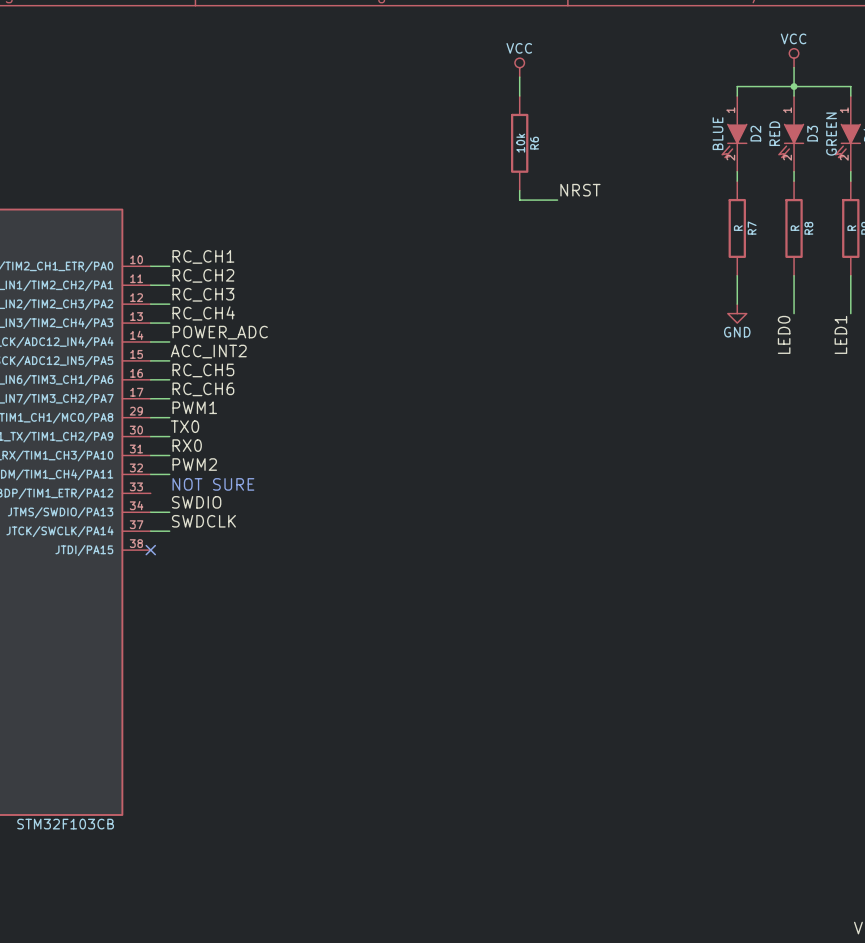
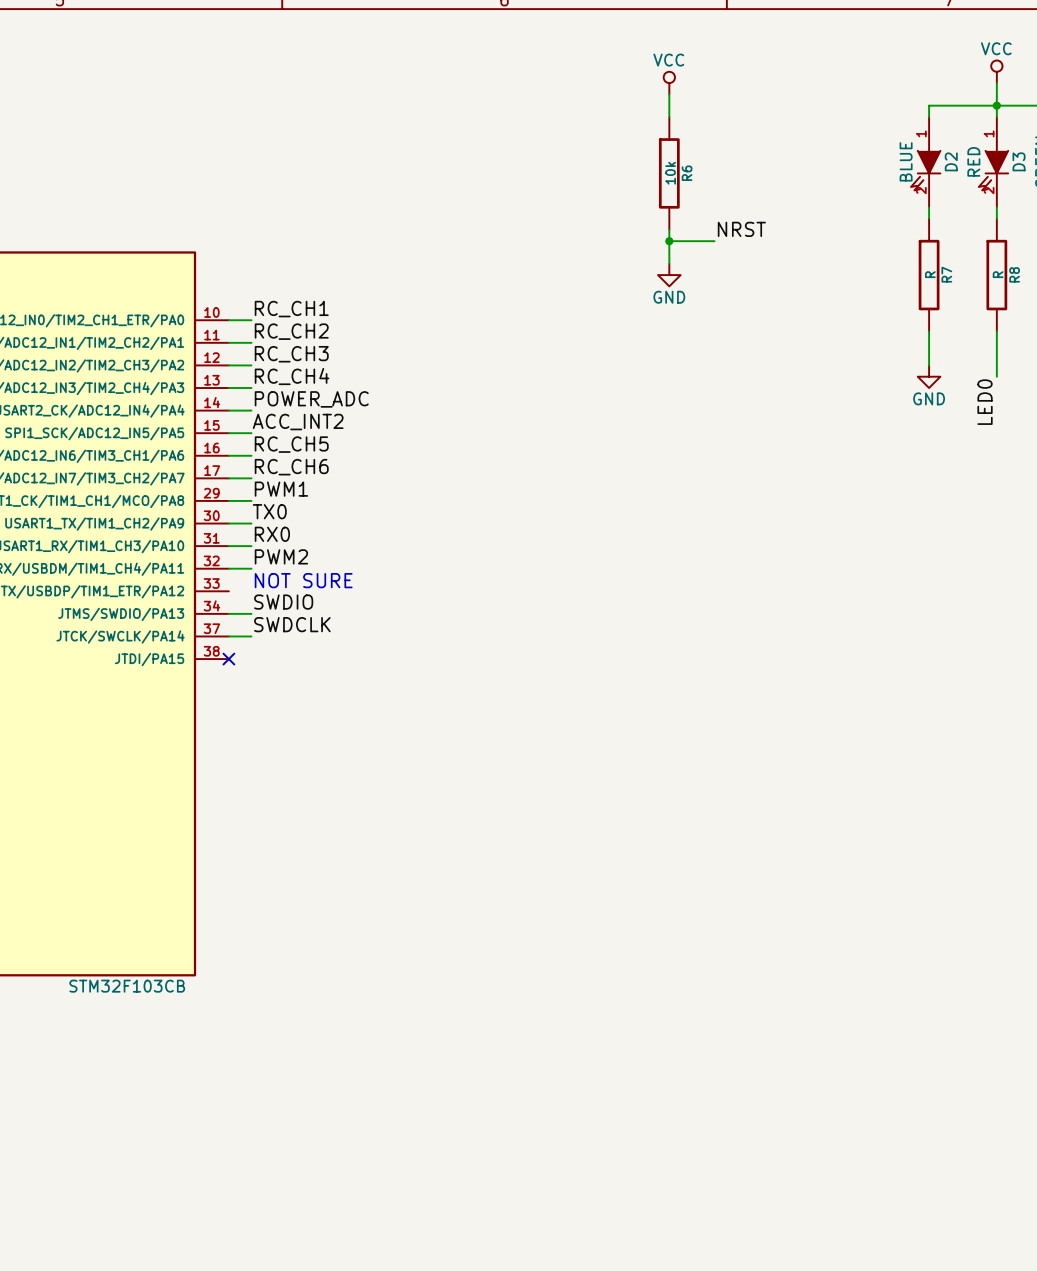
wire: none -> (669, 241) (669, 263)
junction: none -> (669, 241)
power symbol: none -> GND (669, 275)

